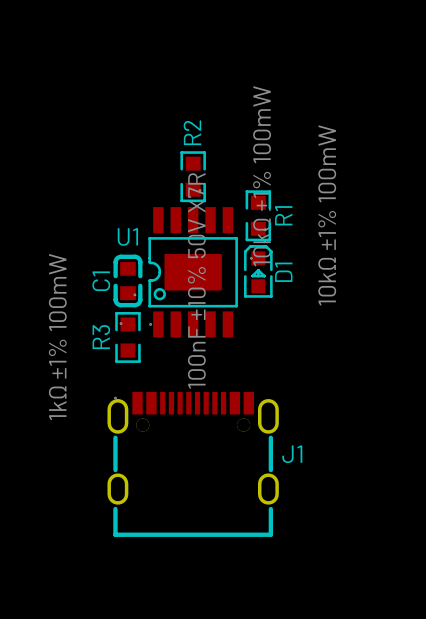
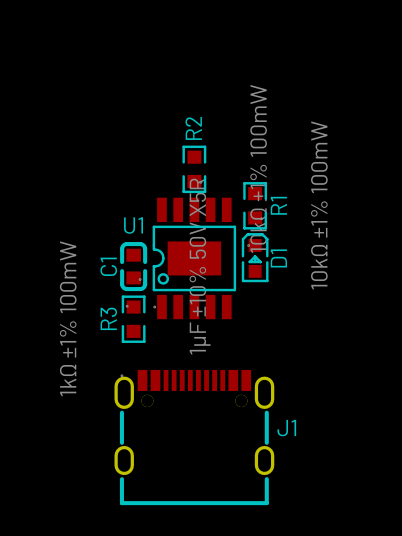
C1 value: 100nF ±10% 50V X7R (196, 280) -> 1µF ±10% 50V X5R (200, 266)

